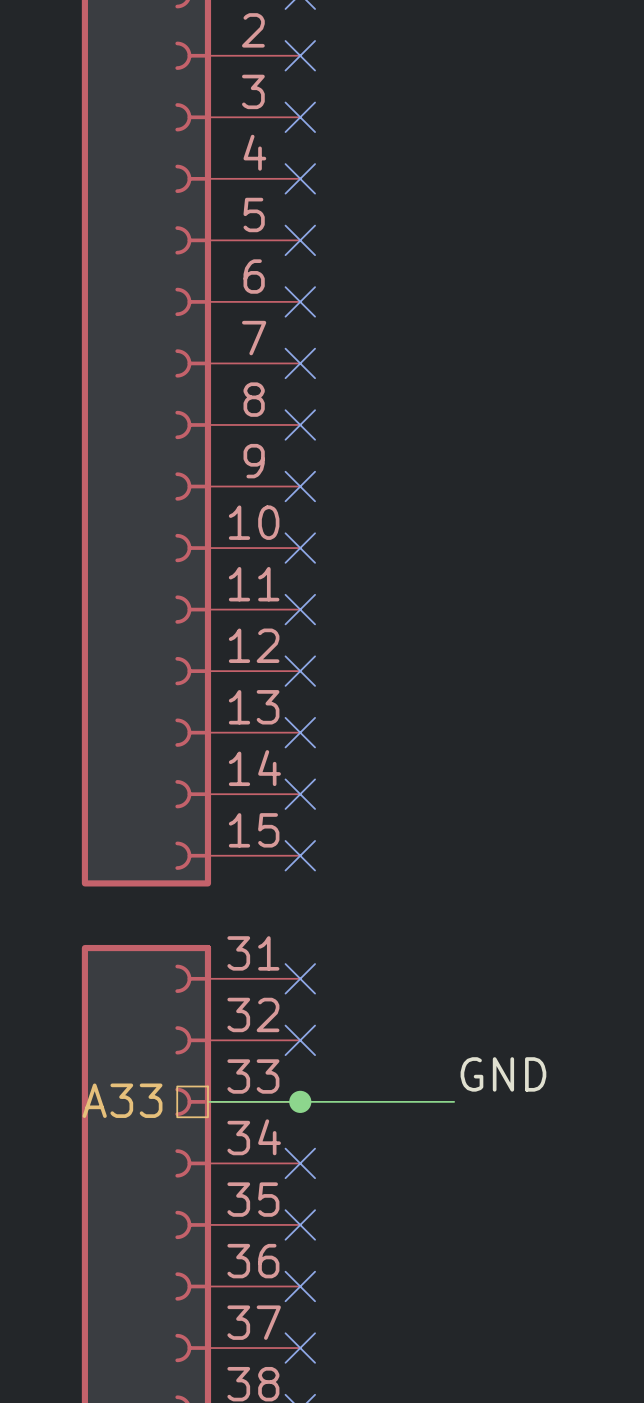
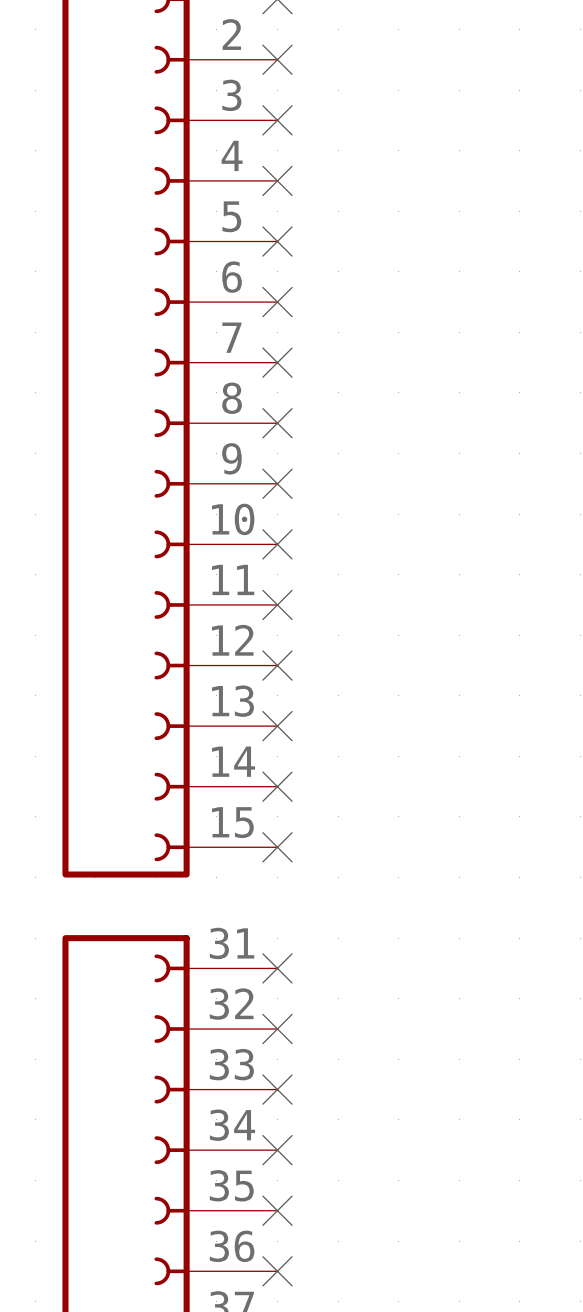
label: GND (503, 1074) -> none
hierarchical label: A33 (122, 1100) -> none
wire: (207, 1101) (454, 1101) -> none
junction: (300, 1101) -> none
no-connect mark: none -> (277, 1089)

